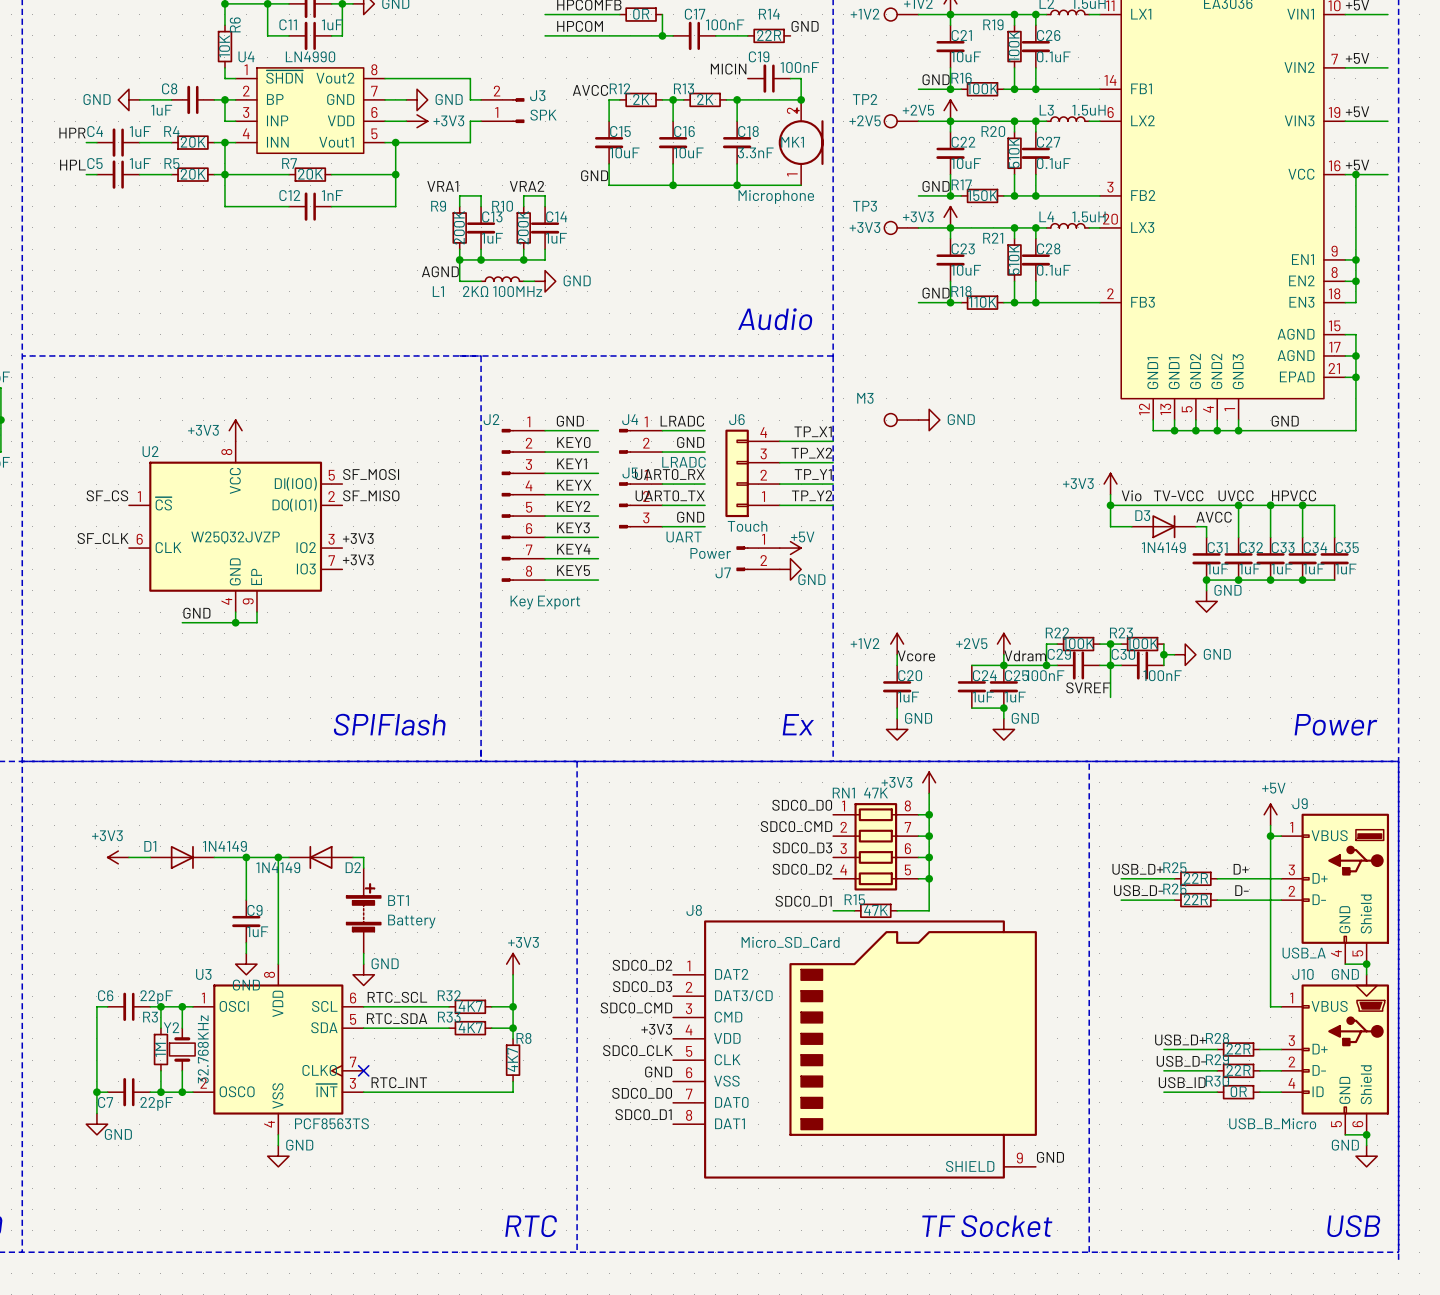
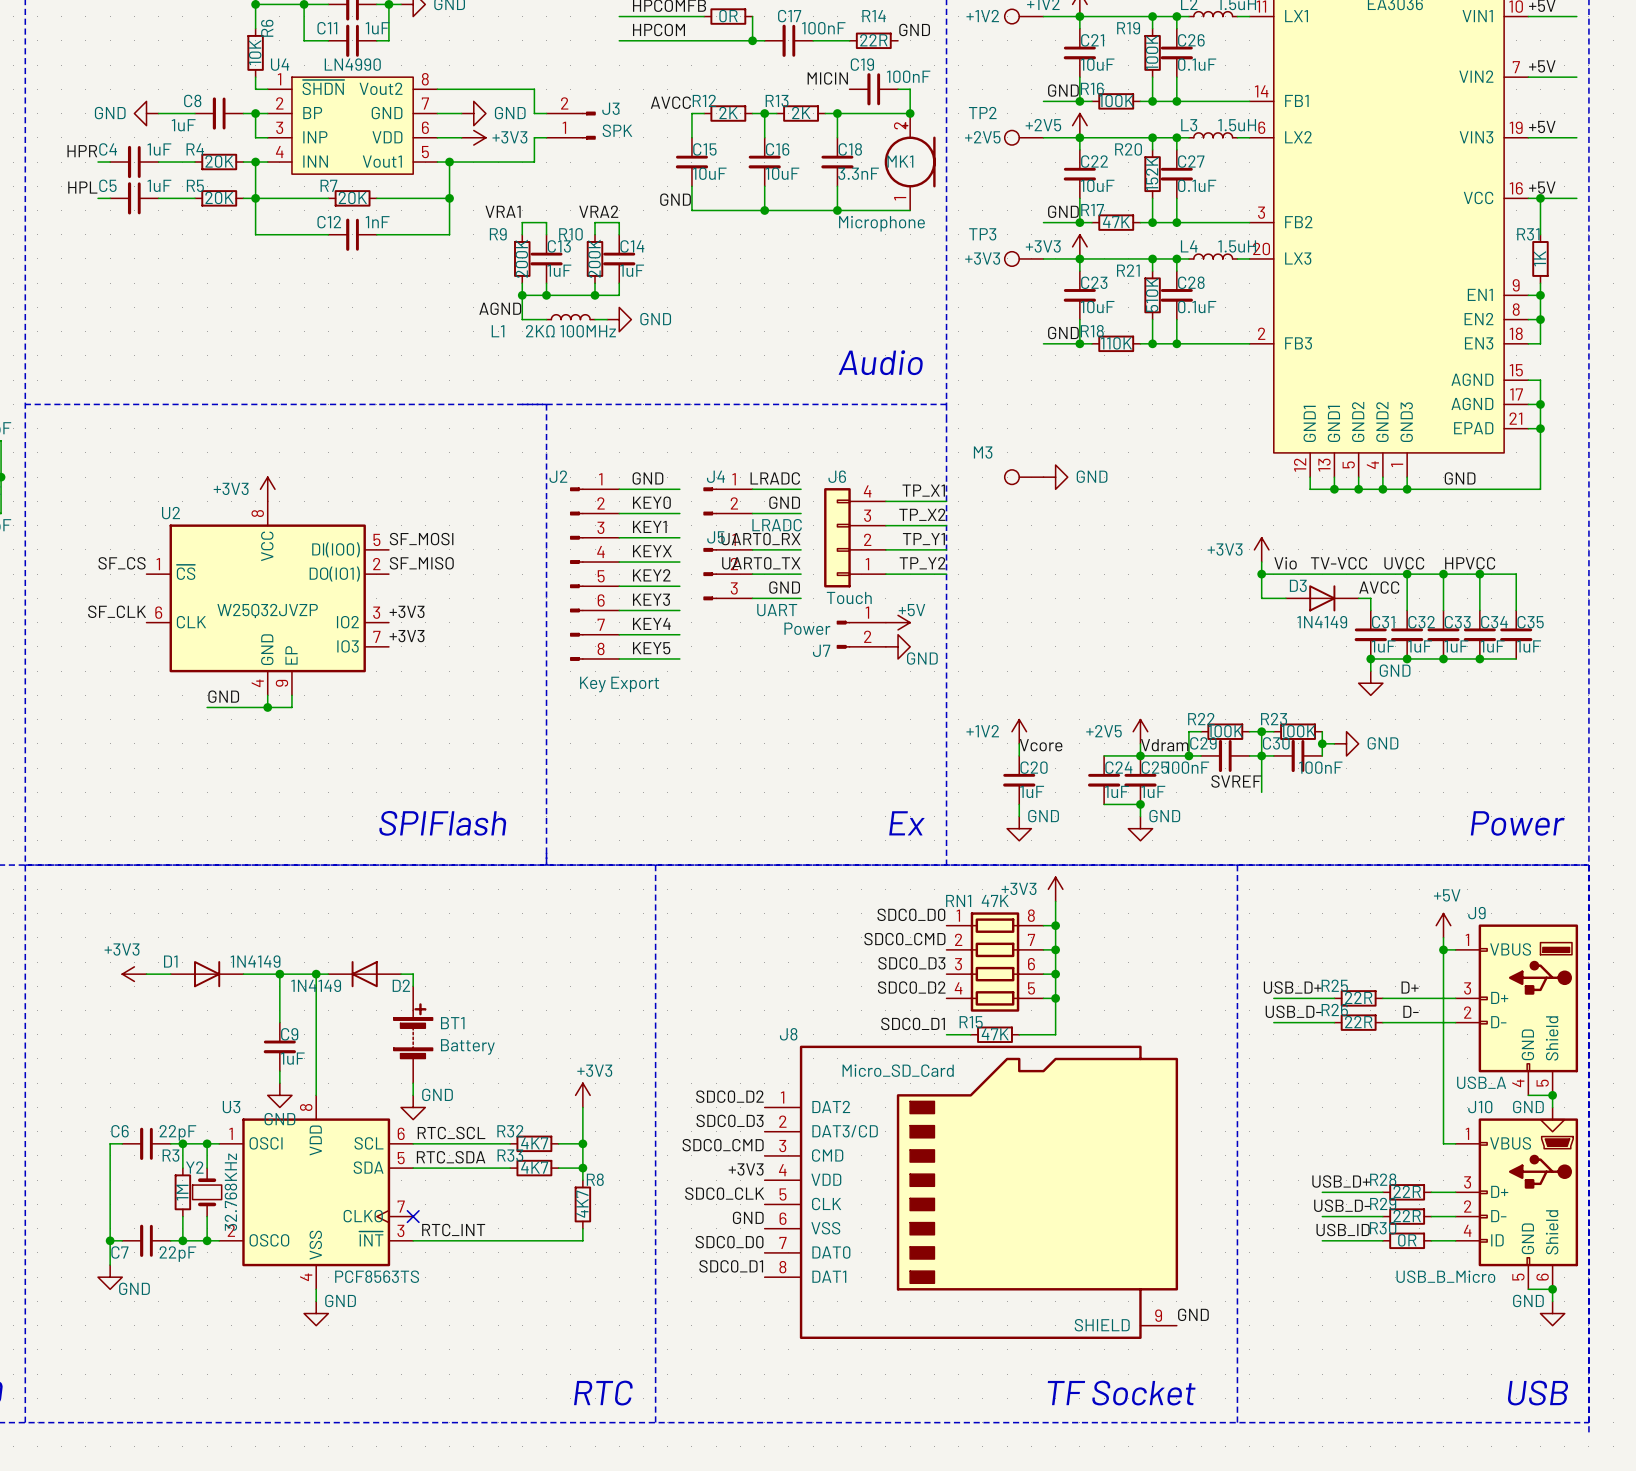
R20 value: 510K (1014, 152) -> 152K (1152, 173)
R17 value: 150K (982, 195) -> 47K (1116, 222)
wire: (1355, 206) (1355, 249) -> none
R31: none -> 1K (1540, 258)

